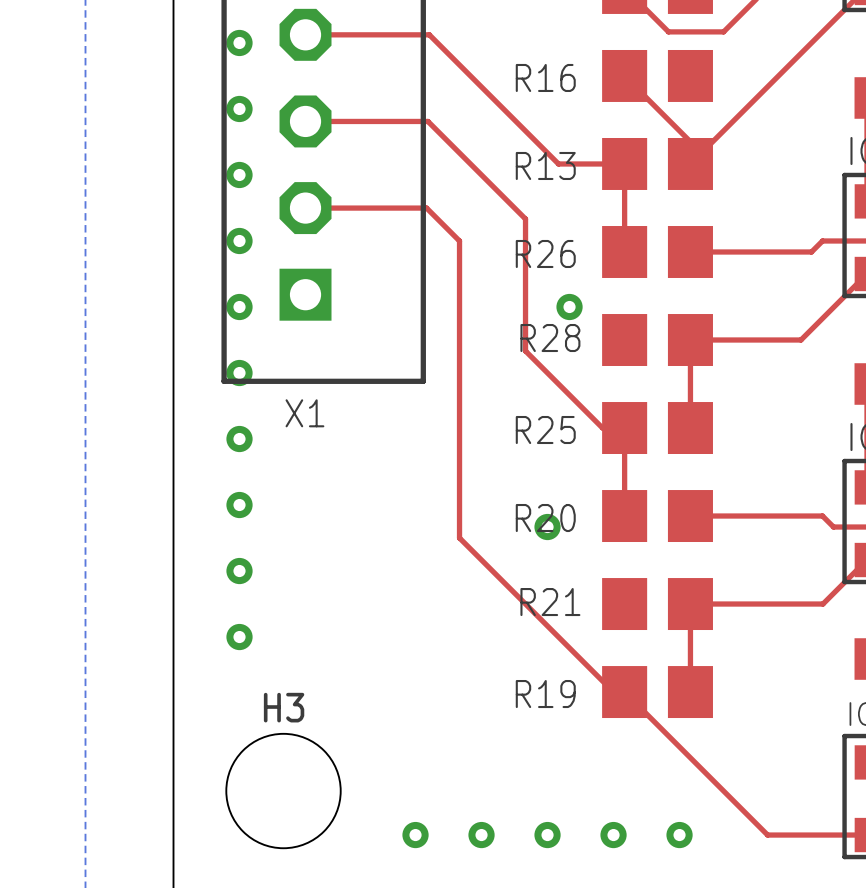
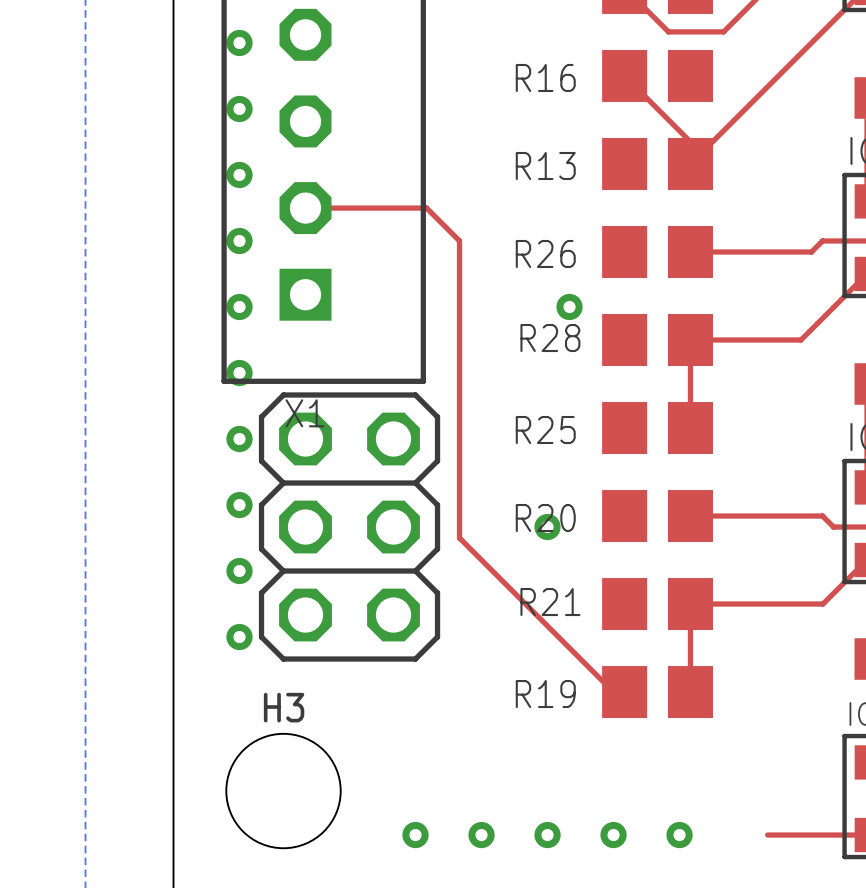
top track: (305, 34) (429, 34) (558, 163) (624, 163) (624, 251) -> none
top track: (305, 121) (427, 121) (525, 218) (525, 351) (602, 428) (624, 428) (624, 516) -> none
part: none -> (349, 527)
top track: (619, 697) (624, 692) (767, 835) -> none

